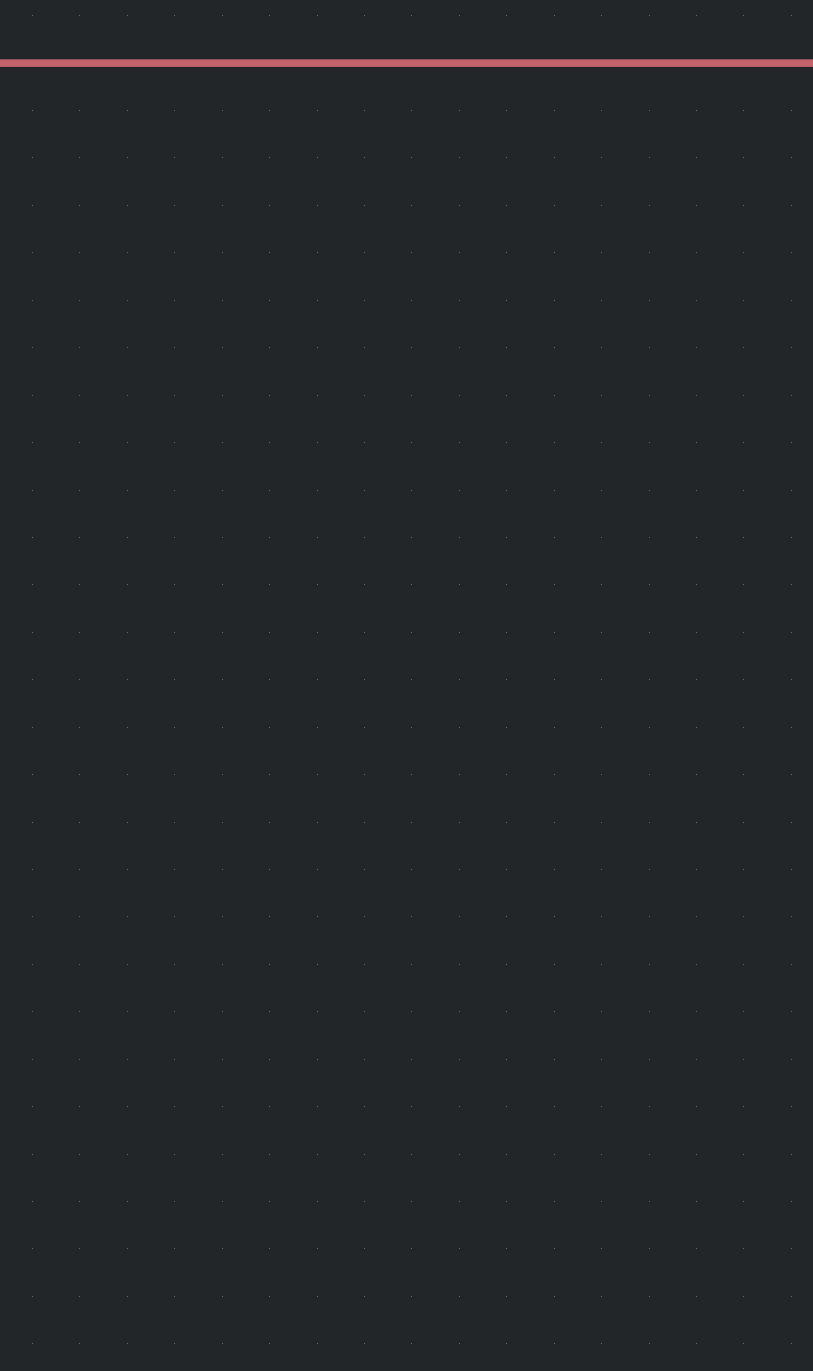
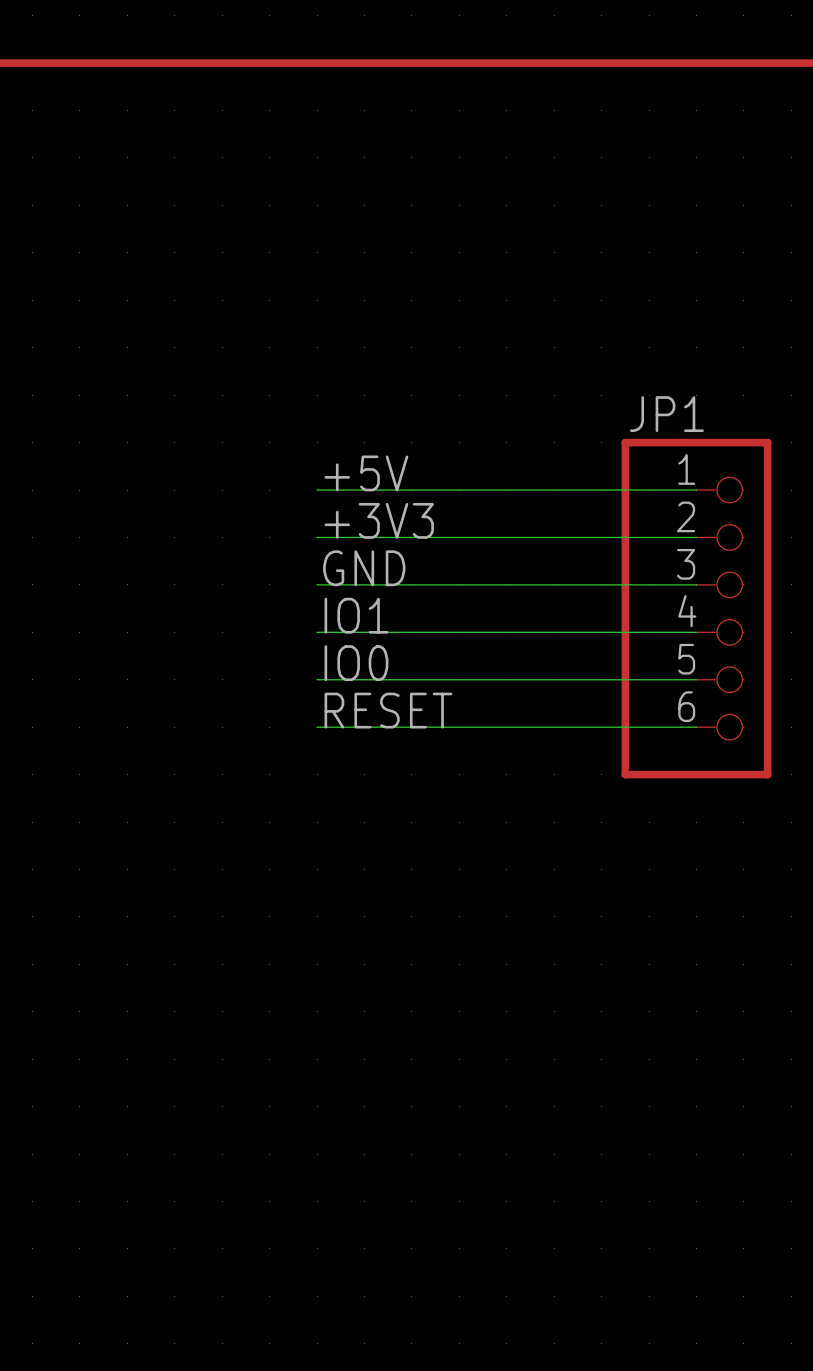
label: none -> +5V (366, 473)
wire: none -> (317, 490) (696, 490)
label: none -> +3V3 (379, 520)
wire: none -> (317, 537) (696, 537)
label: none -> GND (364, 568)
wire: none -> (317, 584) (696, 584)
JP1: none -> (696, 608)
label: none -> IO1 (356, 615)
wire: none -> (317, 632) (696, 632)
label: none -> IO0 (356, 663)
wire: none -> (317, 679) (696, 679)
label: none -> RESET (388, 710)
wire: none -> (317, 727) (696, 727)

